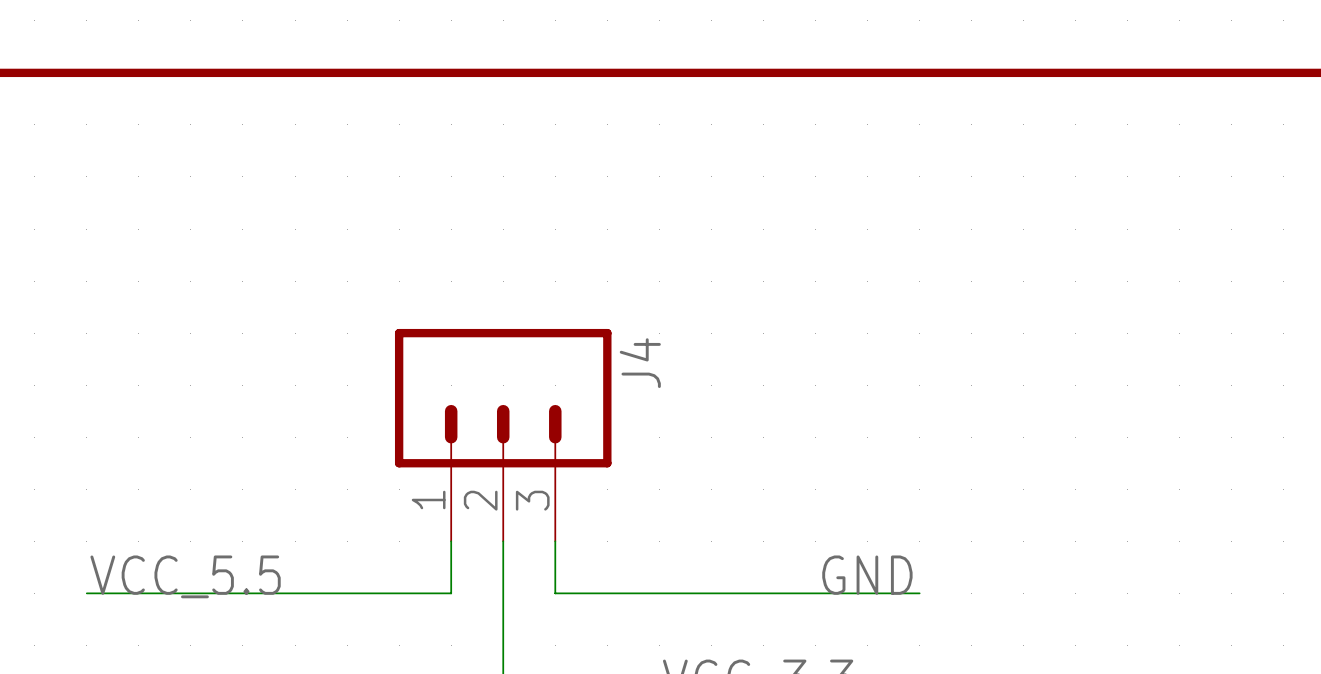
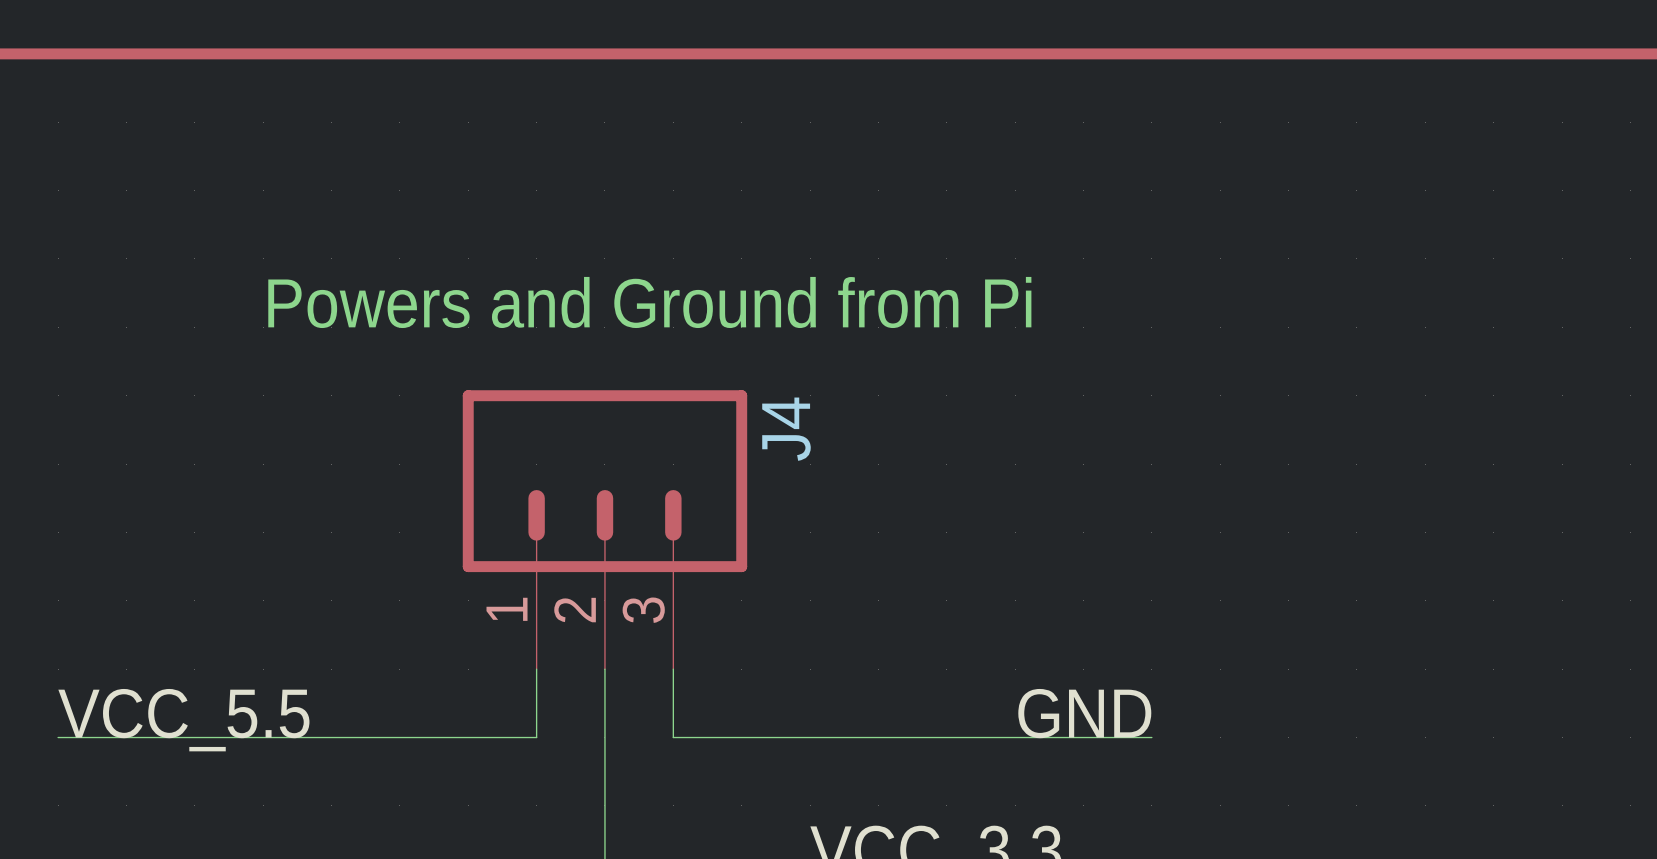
text: none -> Powers and Ground from Pi (649, 302)

